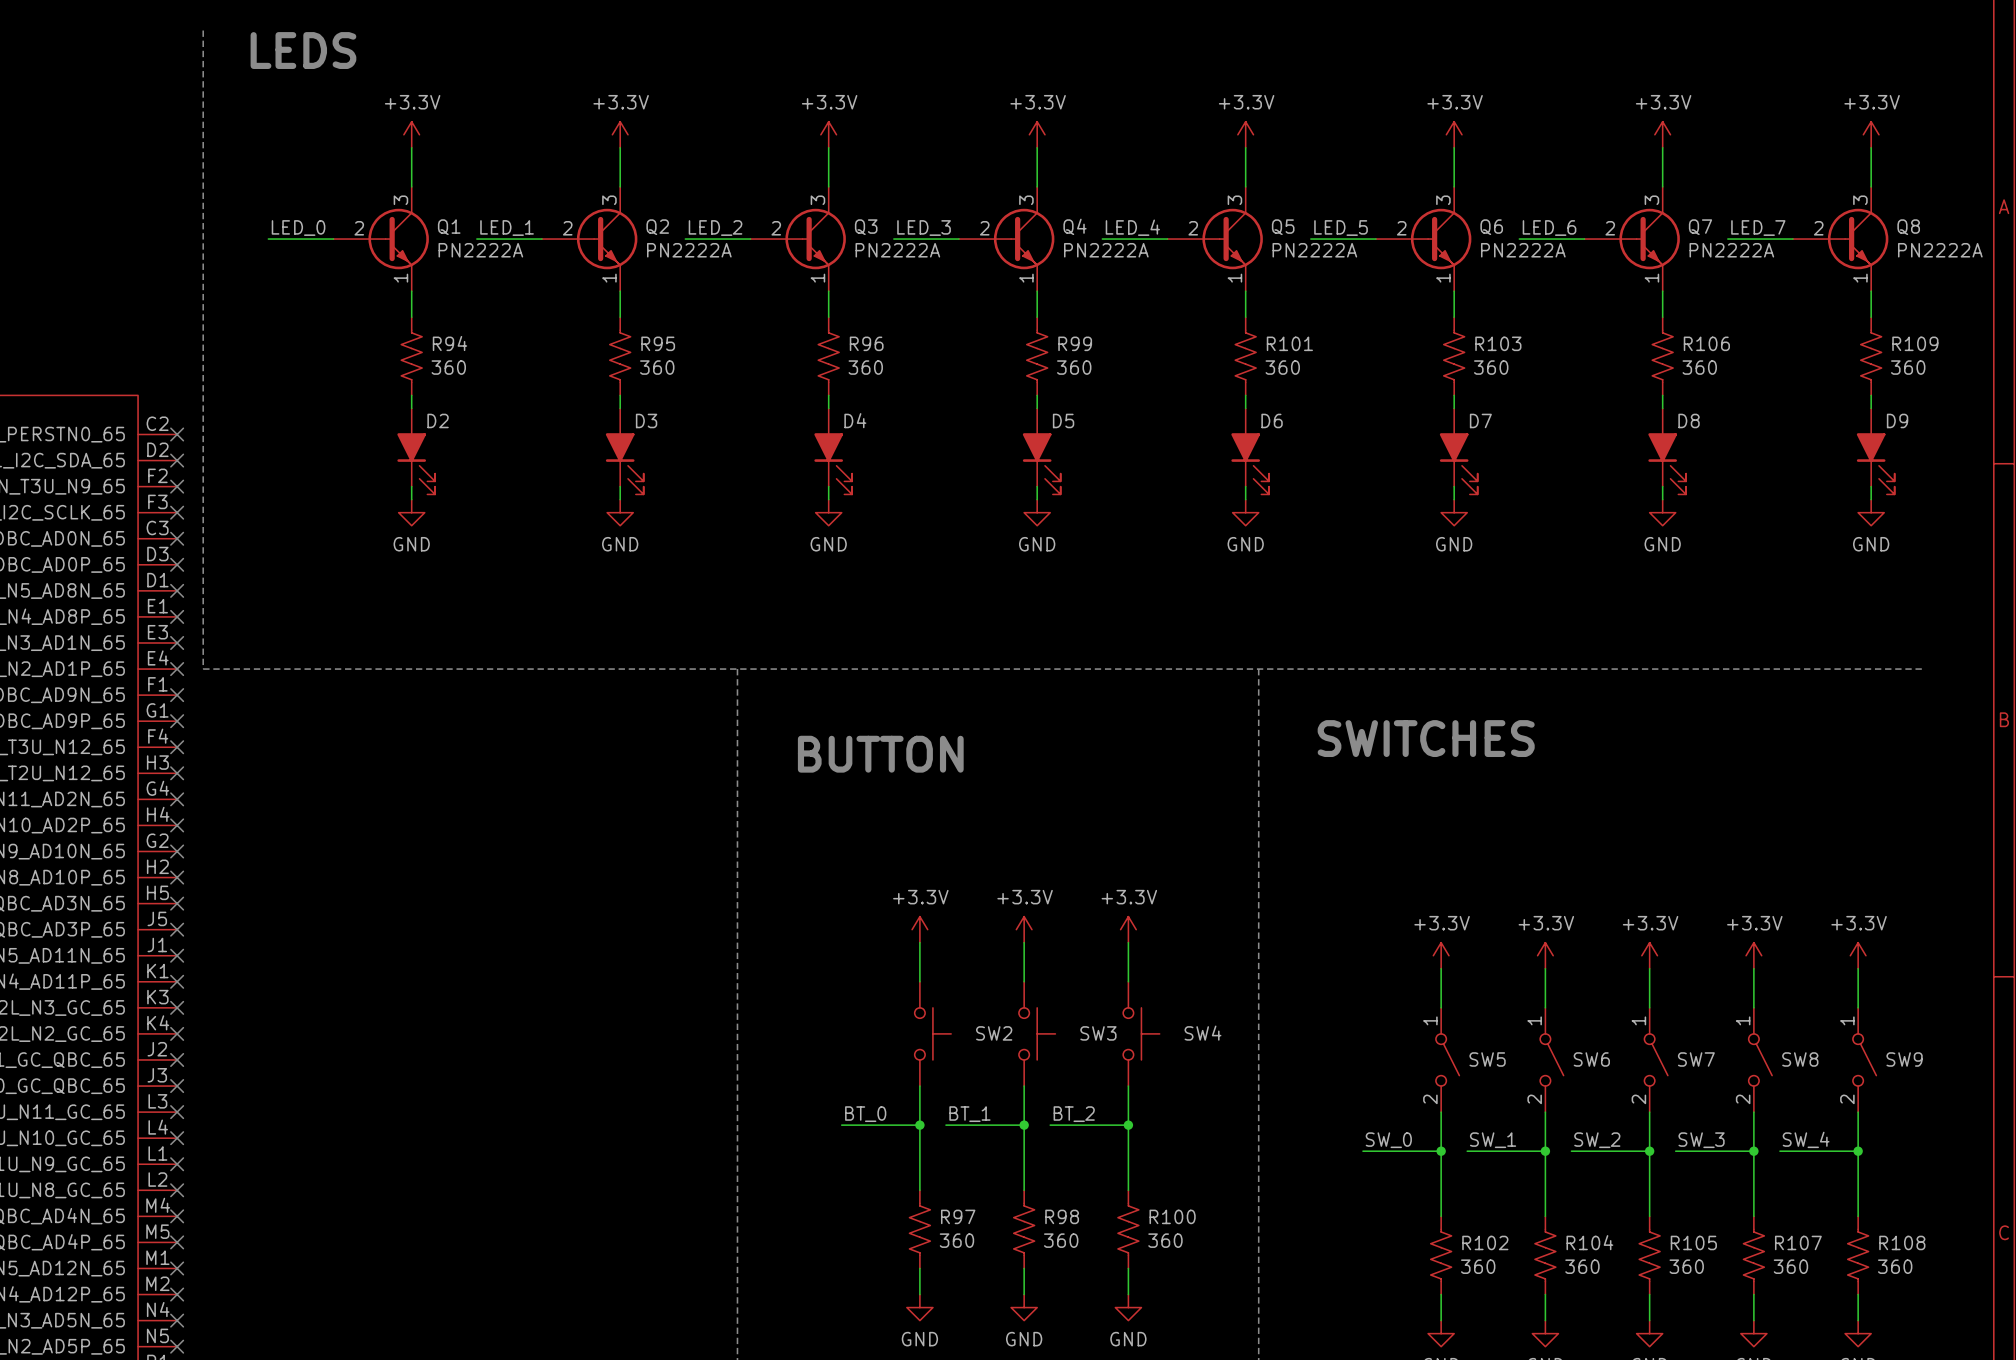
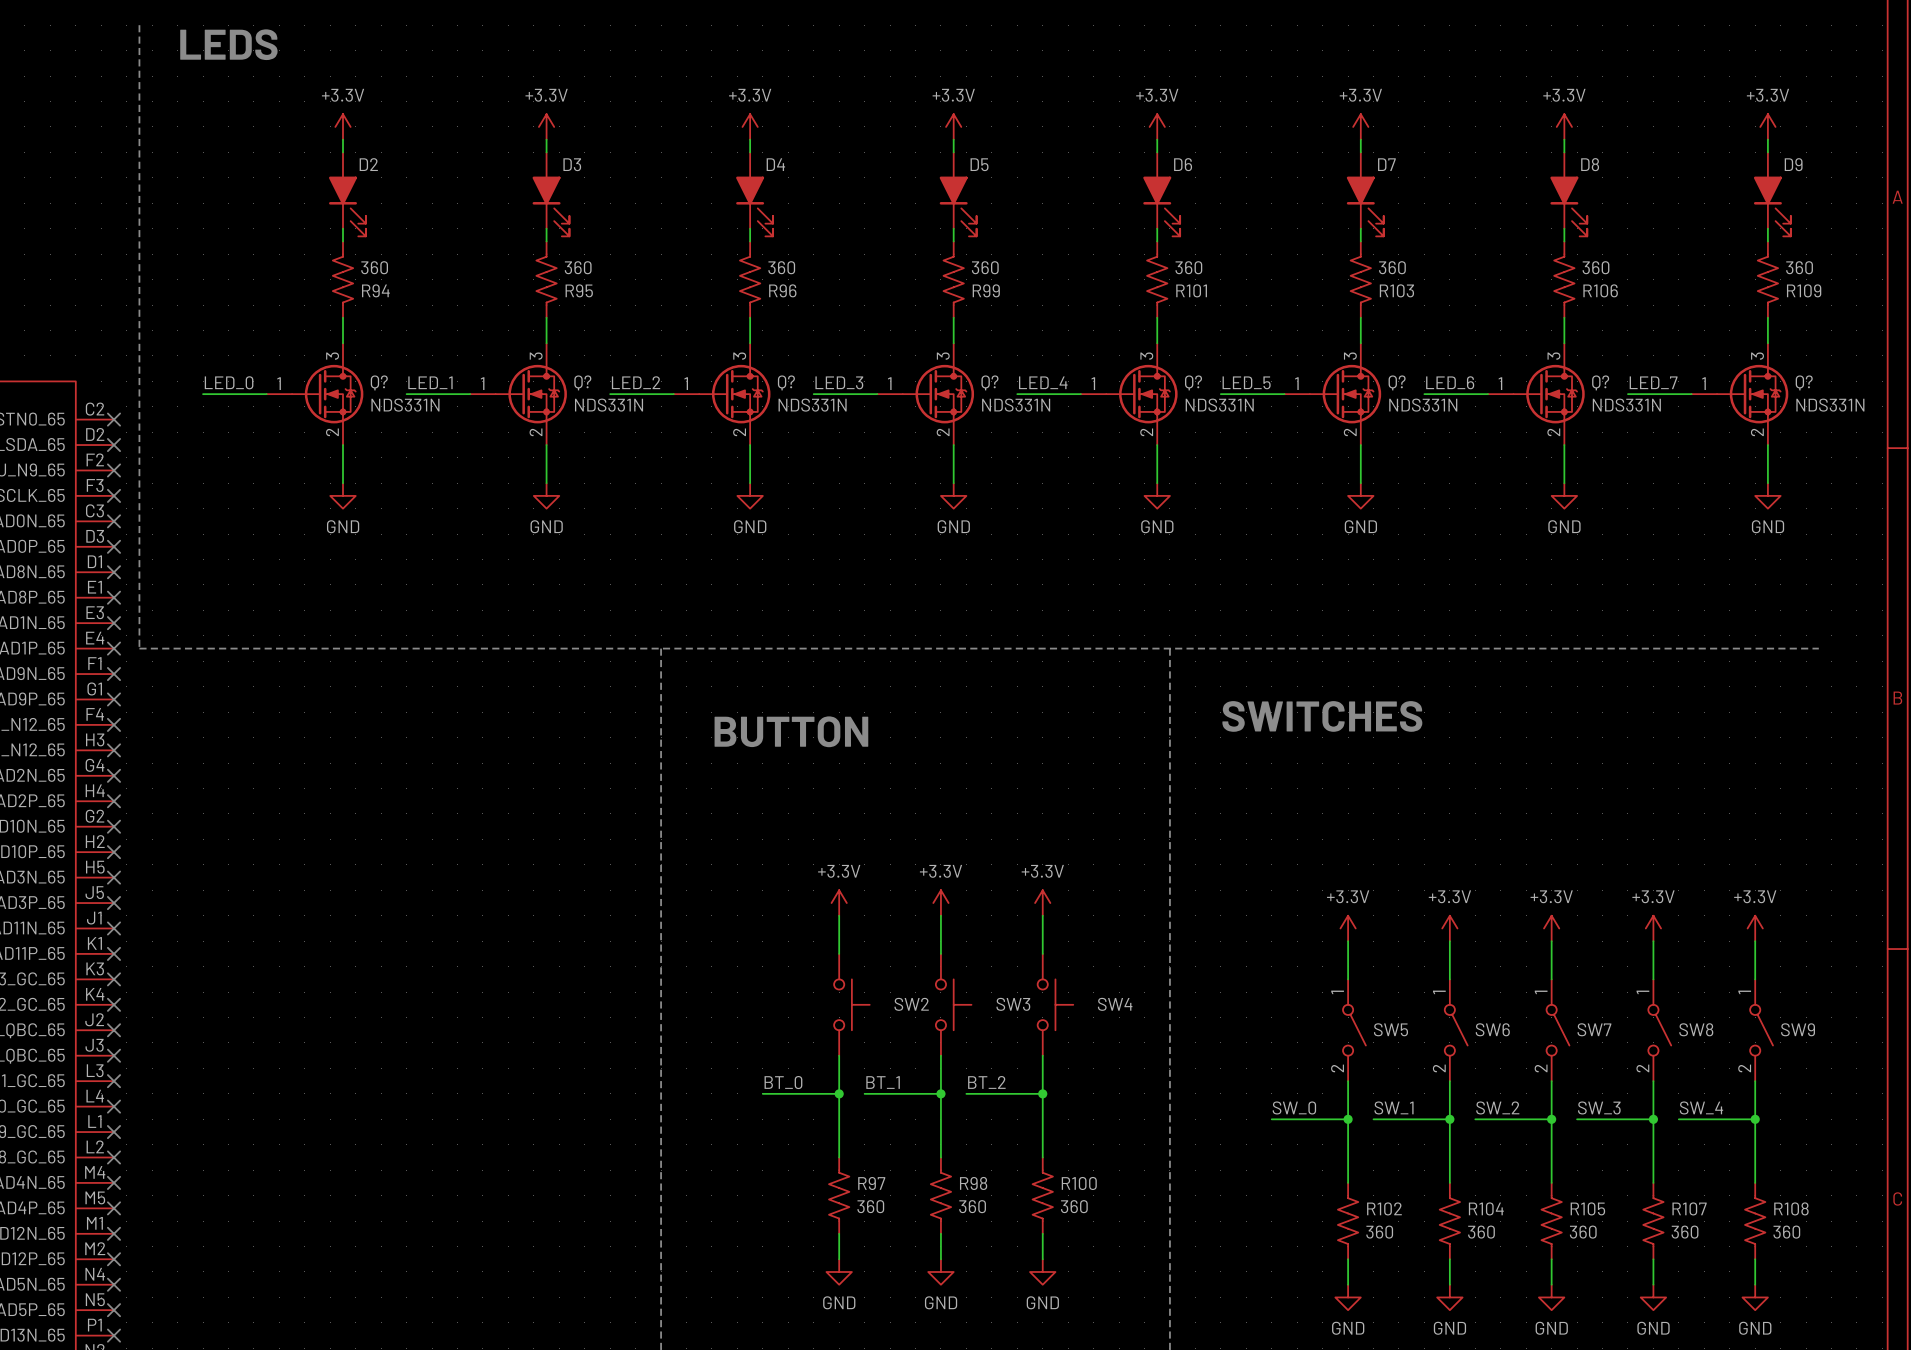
label position: LED_4 (1132, 227) -> LED_4 (1043, 382)
label position: LED_0 (298, 228) -> LED_0 (229, 382)
label position: LED_1 (507, 228) -> LED_1 (430, 382)
label position: LED_2 (715, 228) -> LED_2 (636, 382)
label position: LED_3 (924, 228) -> LED_3 (839, 382)
label position: LED_5 (1341, 228) -> LED_5 (1246, 382)
label position: LED_6 (1549, 228) -> LED_6 (1450, 382)
label position: LED_7 (1758, 228) -> LED_7 (1653, 382)
wire: (268, 239) (333, 239) -> (203, 394) (266, 394)
Q1: PN2222A (381, 239) -> none
wire: (476, 239) (542, 239) -> (406, 394) (470, 394)
Q2: PN2222A (589, 239) -> none
wire: (685, 239) (750, 239) -> (610, 394) (673, 394)
Q3: PN2222A (798, 239) -> none
wire: (893, 239) (958, 239) -> (813, 394) (877, 394)
Q4: PN2222A (1006, 239) -> none
wire: (1102, 239) (1167, 239) -> (1017, 394) (1080, 394)
Q5: PN2222A (1215, 239) -> none
wire: (1310, 239) (1375, 239) -> (1220, 394) (1284, 394)
Q6: PN2222A (1423, 239) -> none
wire: (1519, 239) (1584, 239) -> (1424, 394) (1488, 394)
Q7: PN2222A (1632, 239) -> none
wire: (1727, 239) (1792, 239) -> (1627, 394) (1691, 394)
Q8: PN2222A (1840, 239) -> none
R94 name position: R94 (449, 343) -> R94 (375, 290)
R95 name position: R95 (658, 343) -> R95 (579, 290)
R96 name position: R96 (866, 343) -> R96 (782, 290)
R99 name position: R99 (1075, 343) -> R99 (986, 290)
R101 name position: R101 (1289, 343) -> R101 (1191, 290)
R103 name position: R103 (1498, 343) -> R103 (1396, 290)
R106 name position: R106 (1706, 343) -> R106 (1600, 290)
R109 name position: R109 (1915, 343) -> R109 (1804, 290)
R94 flip: as is (411, 356) -> left-right (343, 279)
R94 position: (411, 356) -> (343, 279)
R95 flip: as is (620, 356) -> left-right (546, 279)
R95 position: (620, 356) -> (546, 279)
R96 flip: as is (828, 356) -> left-right (750, 279)
R96 position: (828, 356) -> (750, 279)
R99 flip: as is (1037, 356) -> left-right (953, 279)
R99 position: (1037, 356) -> (953, 279)
R101 flip: as is (1245, 356) -> left-right (1157, 279)
R101 position: (1245, 356) -> (1157, 279)
R103 flip: as is (1454, 356) -> left-right (1360, 279)
R103 position: (1454, 356) -> (1360, 279)
R106 flip: as is (1662, 356) -> left-right (1564, 279)
R106 position: (1662, 356) -> (1564, 279)
R109 flip: as is (1871, 356) -> left-right (1767, 279)
R109 position: (1871, 356) -> (1767, 279)
R94 value position: 360 (448, 367) -> 360 (374, 267)
R95 value position: 360 (657, 367) -> 360 (578, 267)
R96 value position: 360 (865, 367) -> 360 (781, 267)
R99 value position: 360 (1074, 367) -> 360 (985, 267)
R101 value position: 360 (1282, 367) -> 360 (1188, 267)
R103 value position: 360 (1491, 367) -> 360 (1392, 267)
R106 value position: 360 (1699, 367) -> 360 (1595, 267)
R109 value position: 360 (1908, 367) -> 360 (1799, 267)
wire: (411, 395) (411, 408) -> (343, 228) (343, 241)
wire: (620, 395) (620, 408) -> (546, 228) (546, 241)
wire: (828, 395) (828, 408) -> (750, 228) (750, 241)
wire: (1037, 395) (1037, 408) -> (953, 228) (953, 241)
wire: (1245, 395) (1245, 408) -> (1157, 228) (1157, 241)
wire: (1454, 395) (1454, 408) -> (1360, 228) (1360, 241)
wire: (1662, 395) (1662, 408) -> (1564, 228) (1564, 241)
wire: (1871, 395) (1871, 408) -> (1767, 228) (1767, 241)
Q?: none -> NDS331N (315, 394)
Q?: none -> NDS331N (518, 394)
Q?: none -> NDS331N (722, 394)
Q?: none -> NDS331N (925, 394)
Q?: none -> NDS331N (1129, 394)
Q?: none -> NDS331N (1332, 394)
Q?: none -> NDS331N (1536, 394)
Q?: none -> NDS331N (1739, 394)
D2 position: (416, 451) -> (347, 194)
D3 position: (624, 451) -> (551, 194)
D4 position: (833, 451) -> (754, 194)
D5 position: (1041, 451) -> (958, 194)
D6 position: (1250, 451) -> (1161, 194)
D7 position: (1458, 451) -> (1365, 194)
D8 position: (1667, 451) -> (1568, 194)
D9 position: (1875, 451) -> (1772, 194)

